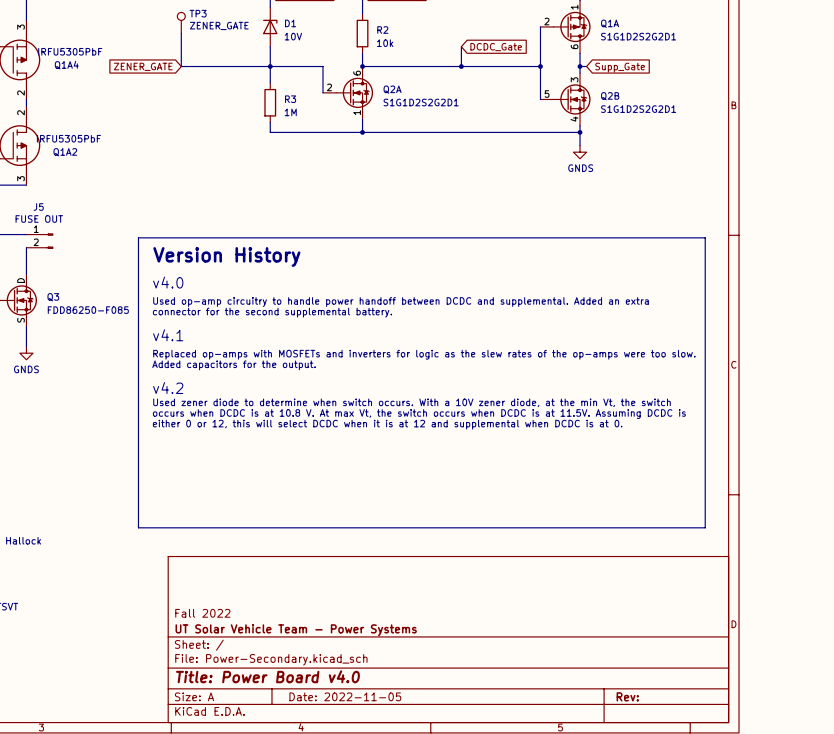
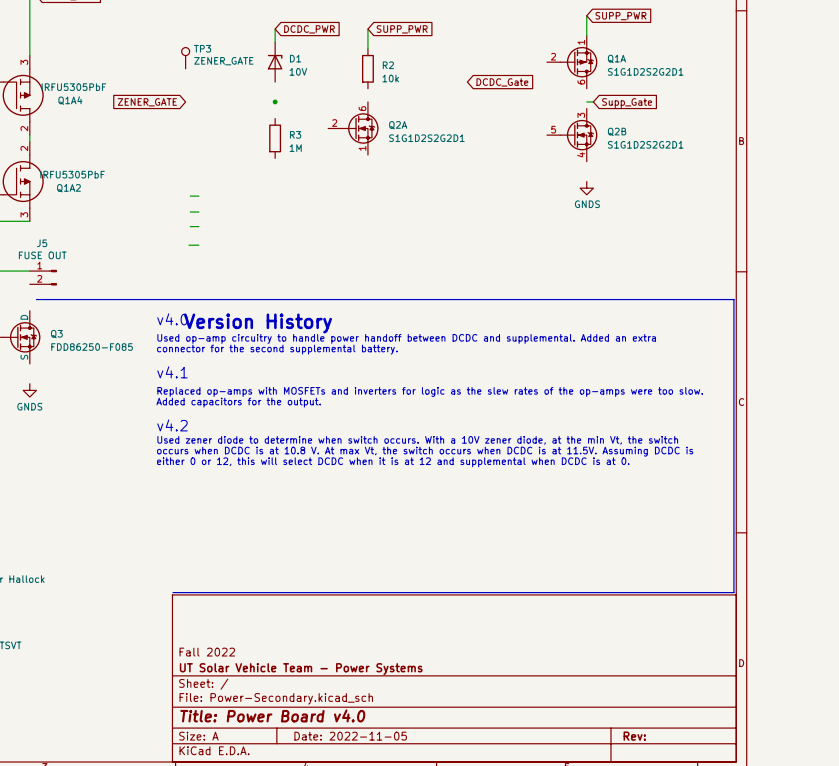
wire: (540, 26) (540, 99) -> none
wire: (181, 33) (181, 66) (322, 66) (322, 92) -> none
wire: (270, 46) (270, 82) -> none
wire: (461, 46) (461, 66) -> none
wire: (362, 53) (362, 66) (540, 66) -> none
wire: (580, 53) (580, 73) -> none
junction: (362, 66) -> none
junction: (461, 66) -> none
junction: (540, 66) -> none
junction: (580, 66) -> none
wire: (362, 119) (362, 132) -> none
wire: (270, 122) (270, 132) (580, 132) -> none
wire: (580, 125) (580, 145) -> none
junction: (362, 132) -> none
junction: (580, 132) -> none
wire: none -> (190, 196) (198, 196)
wire: none -> (190, 212) (198, 212)
wire: none -> (190, 226) (198, 226)
wire: none -> (188, 245) (198, 245)
line: (138, 237) (705, 237) (705, 527) (138, 527) (138, 237) -> none
wire: (26, 247) (26, 274) -> none
text position: Version History (226, 257) -> Version History (257, 323)
line: none -> (36, 299) (733, 299) (733, 592) (173, 592)
wire: (26, 326) (26, 346) -> none

